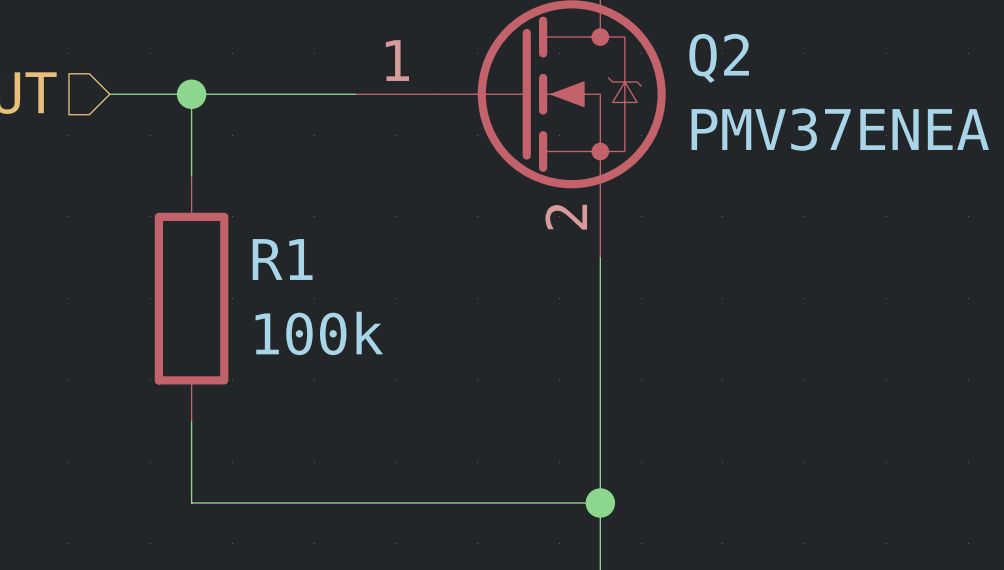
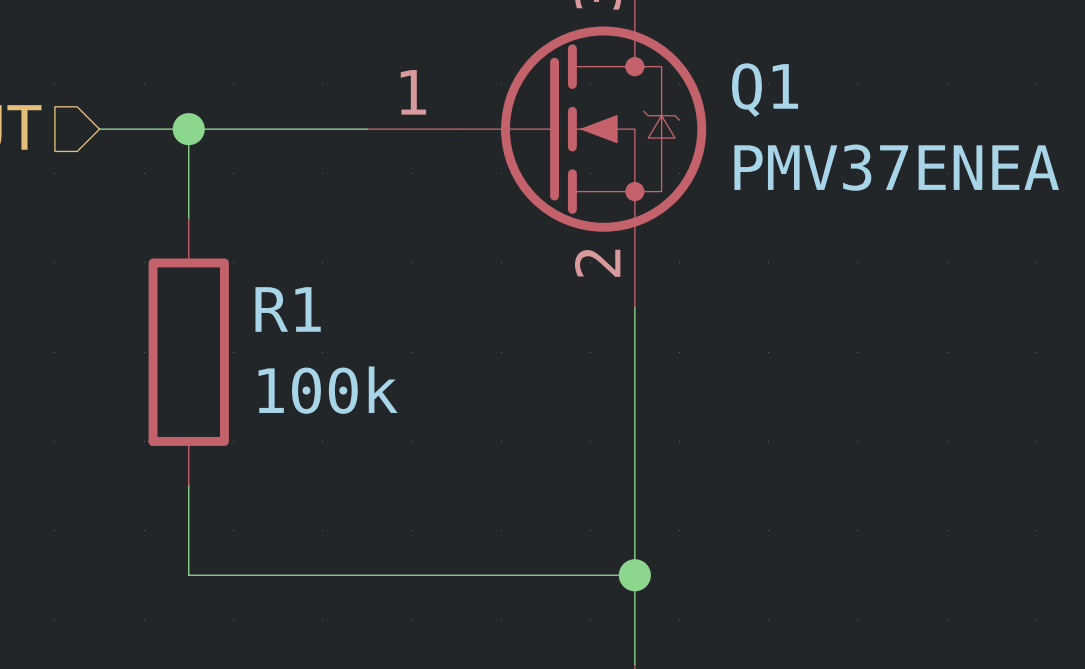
Q2 name: Q2 (719, 58) -> Q1 (765, 90)

